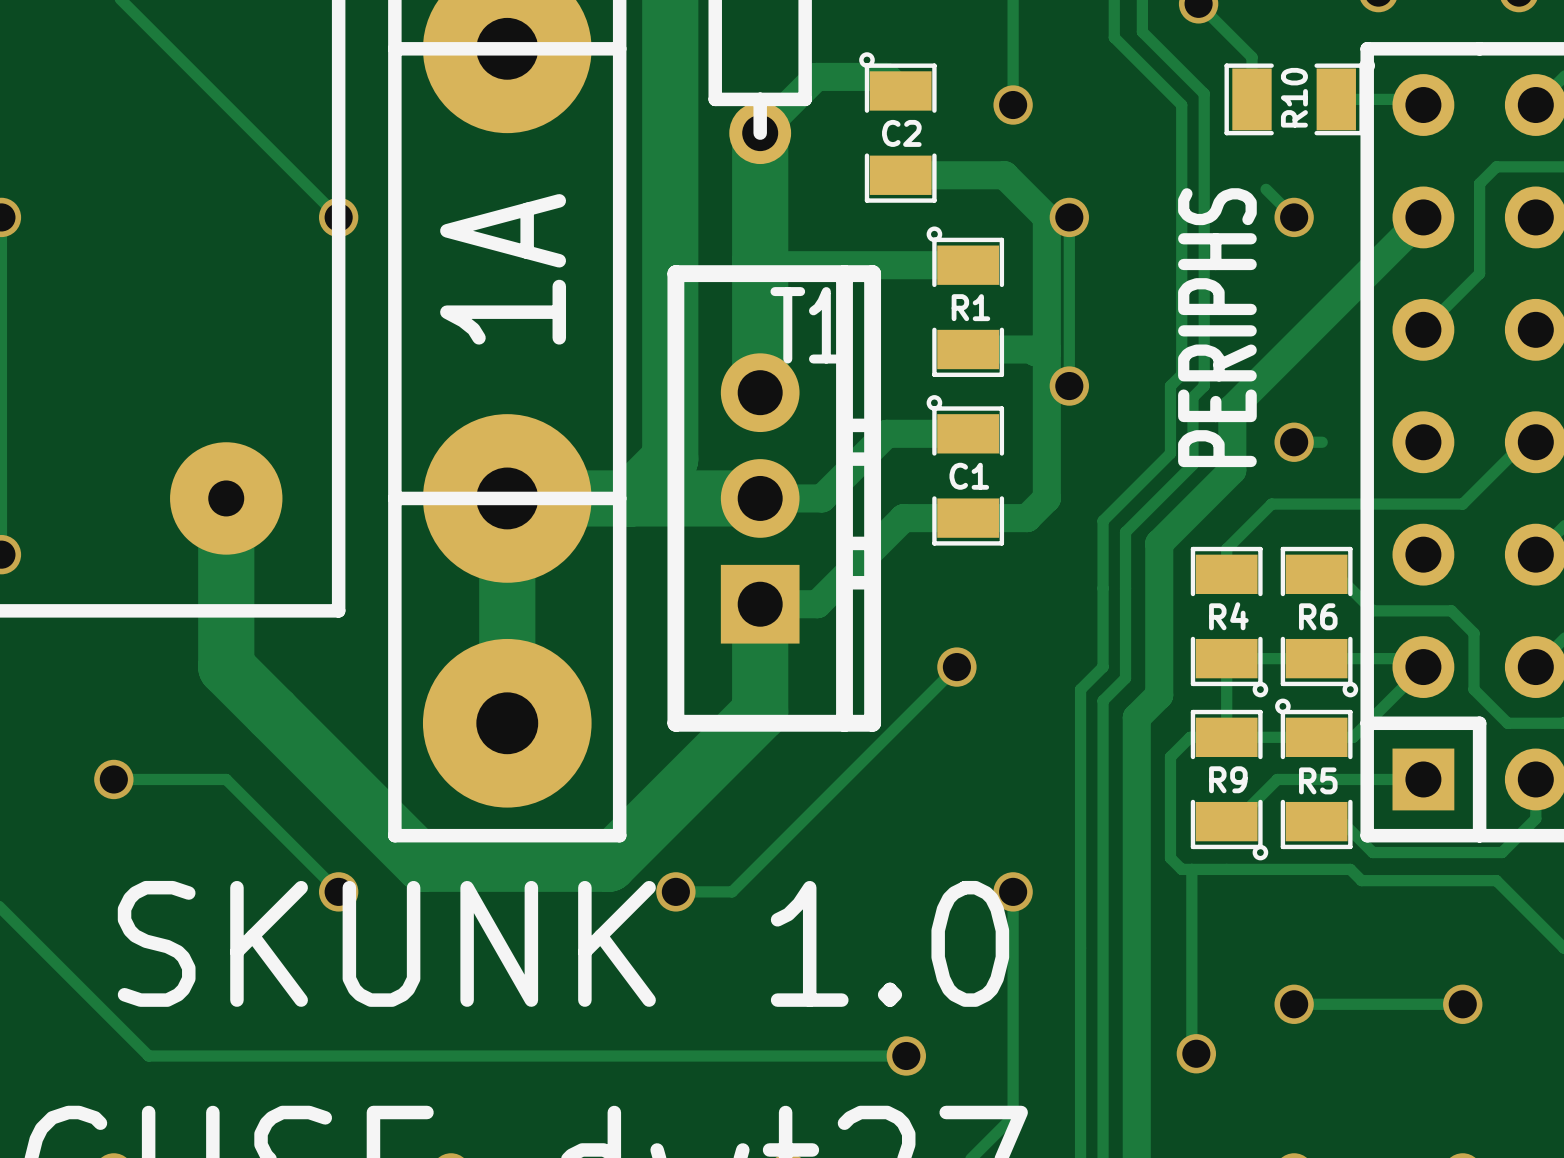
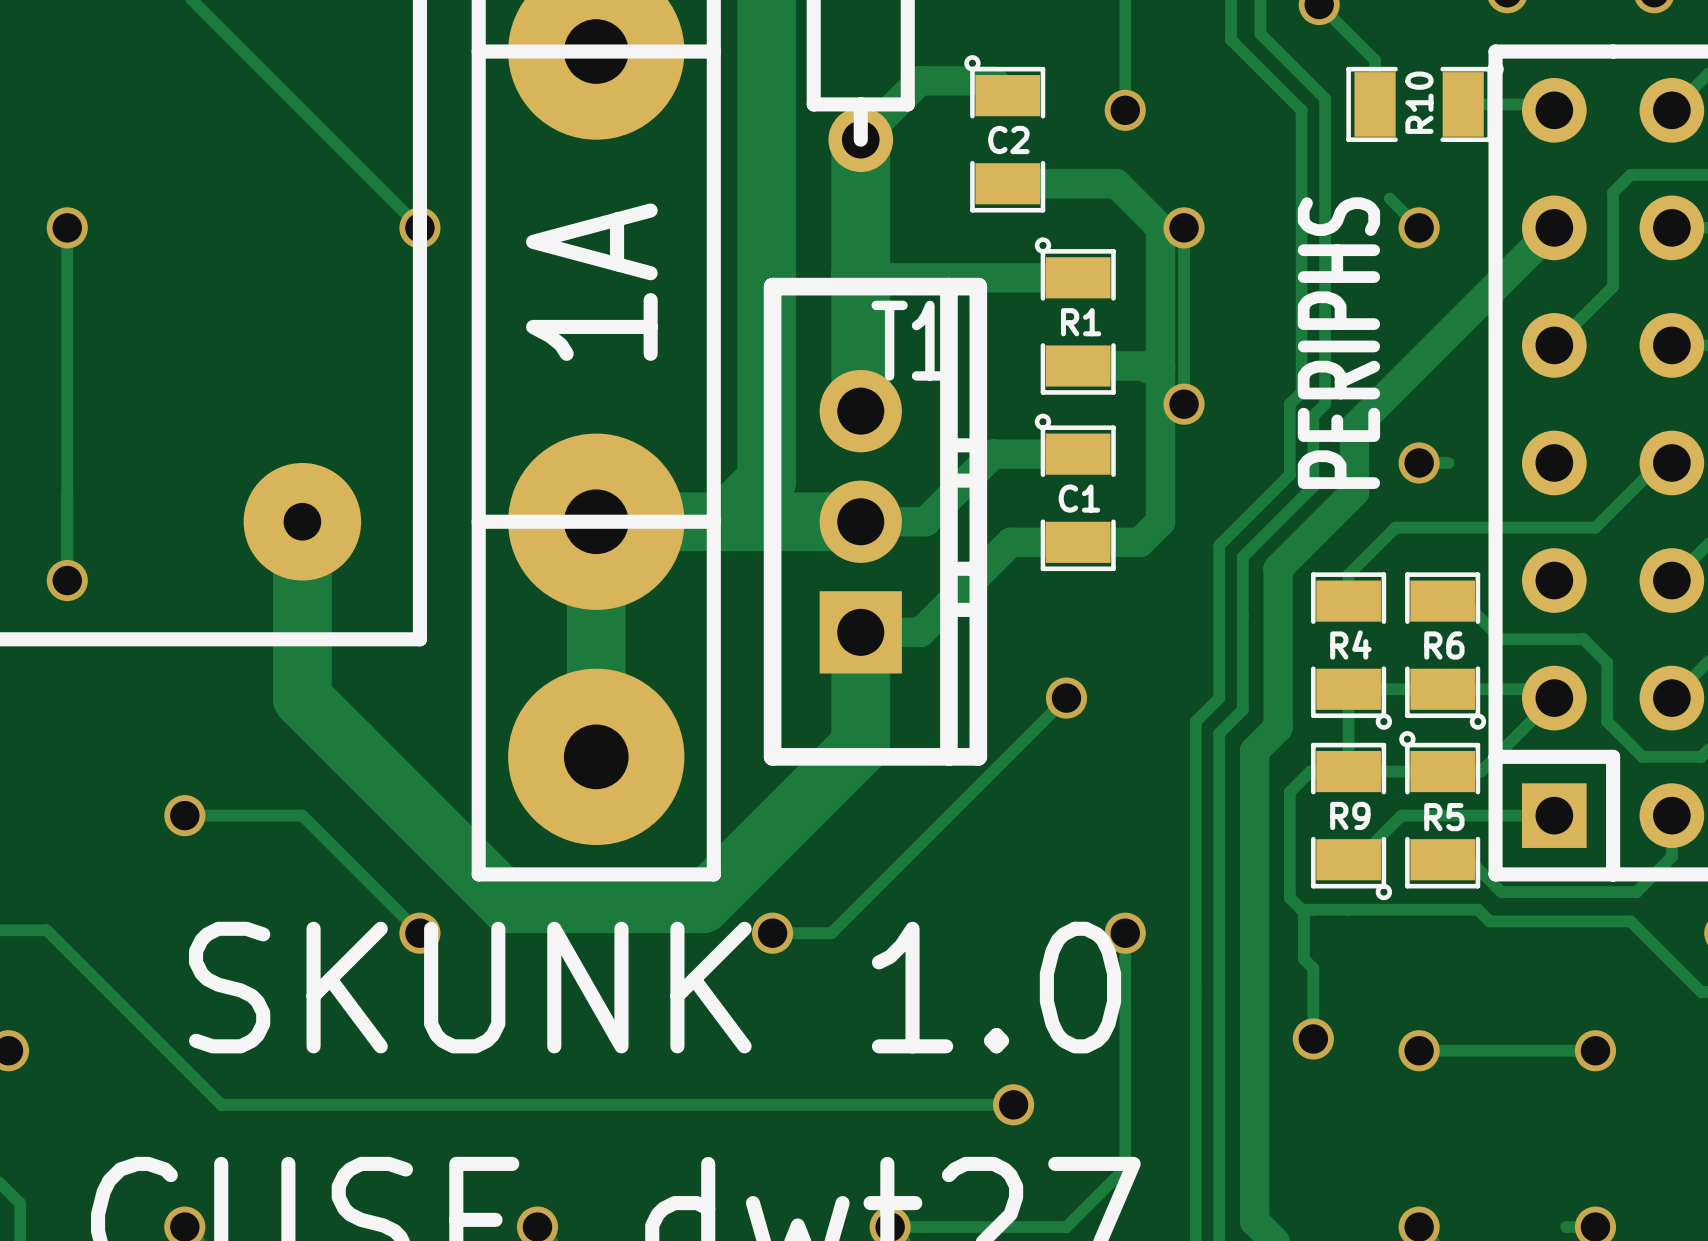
track: none -> (1303, 909) (1303, 959) (1313, 968) (1313, 1038)
track: (1191, 869) (1191, 1049) (1196, 1053) -> none
via position: (1196, 1053) -> (1313, 1038)

